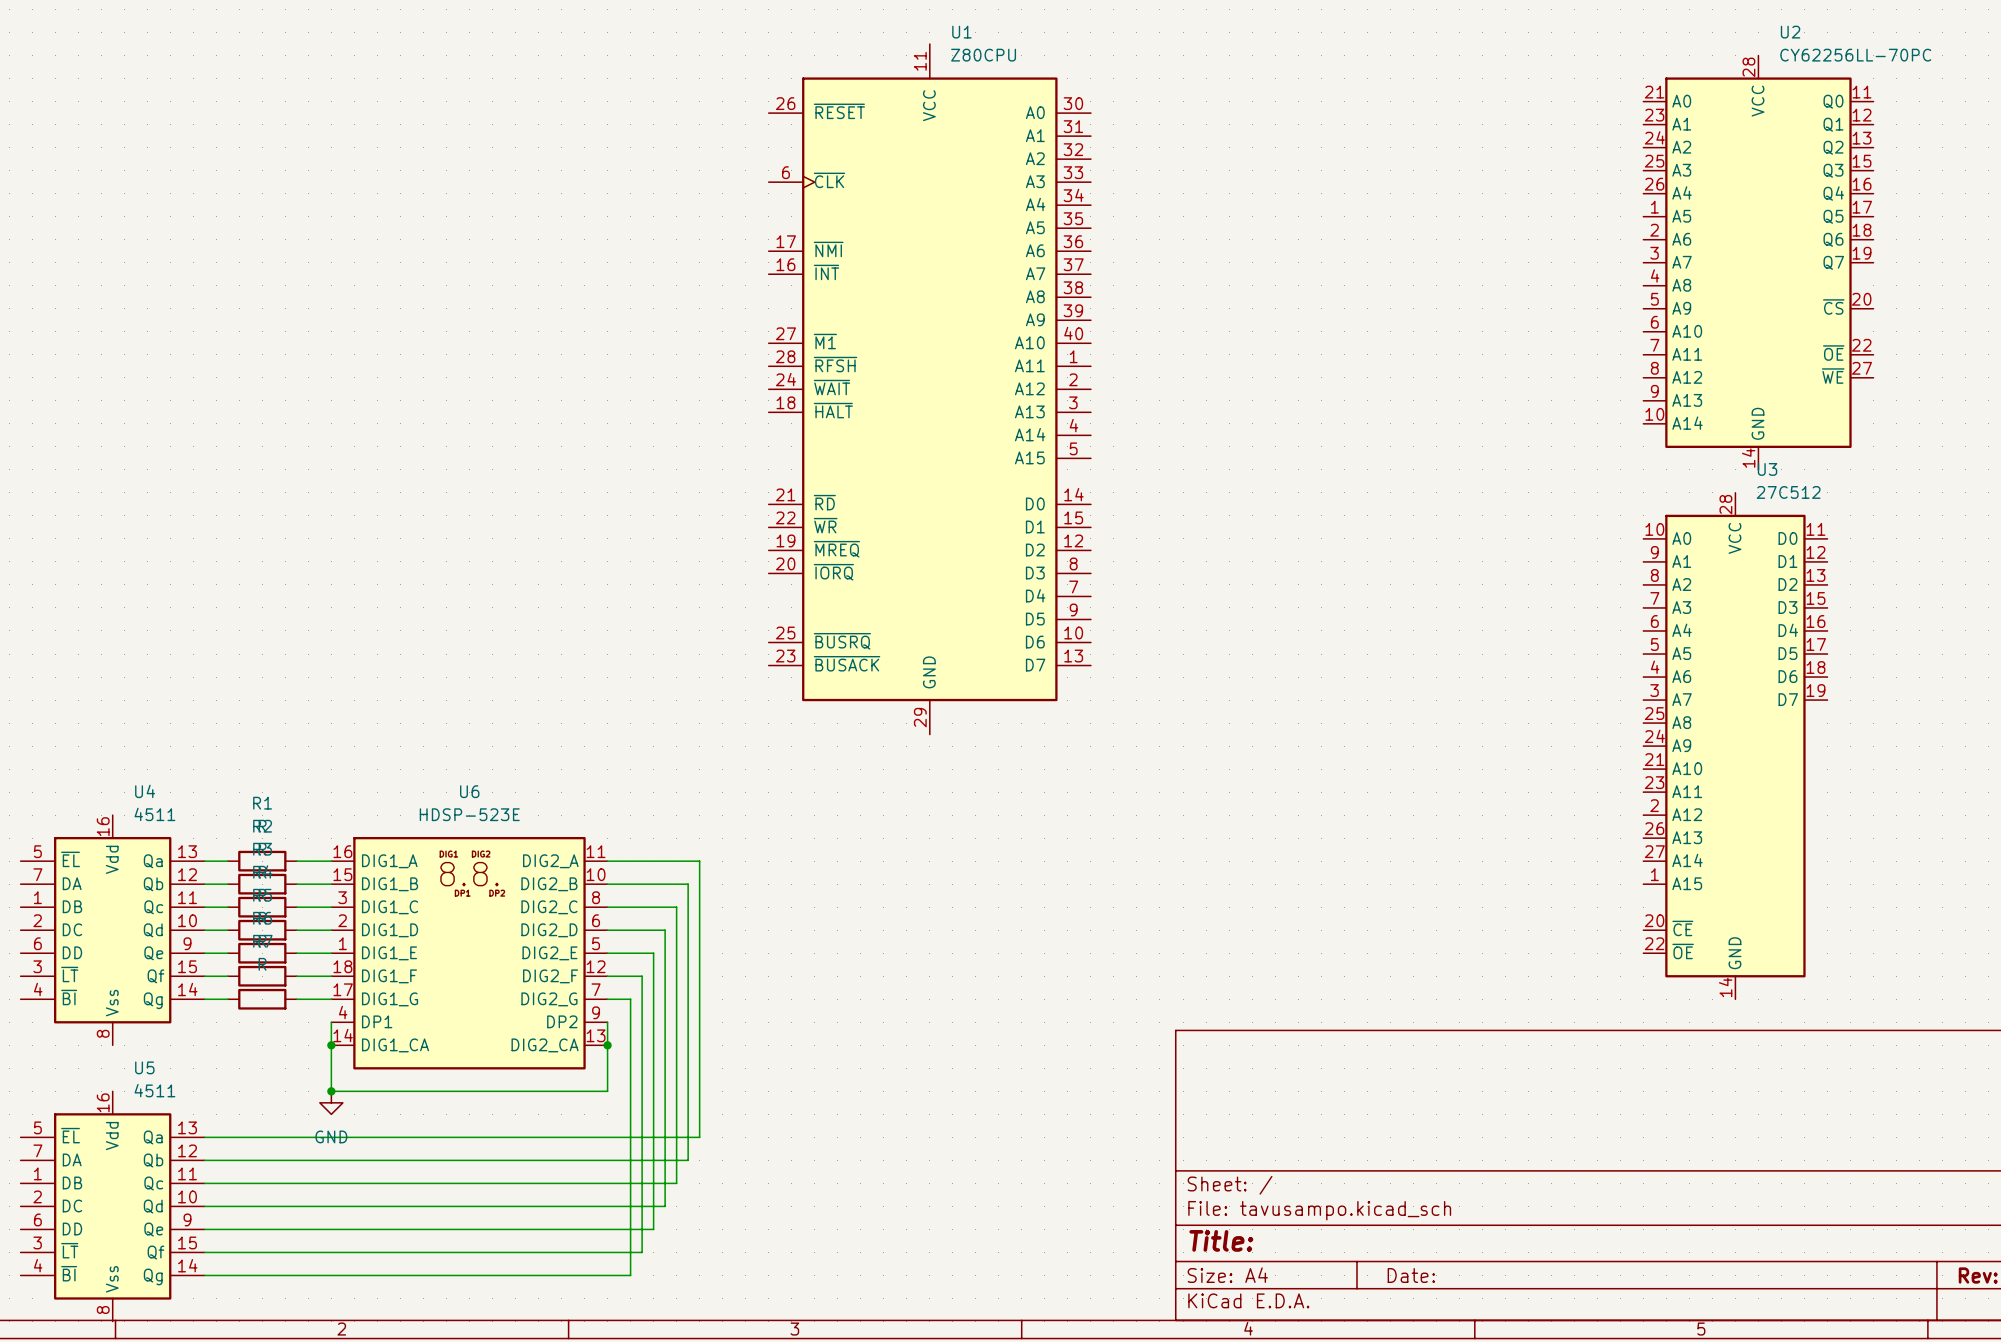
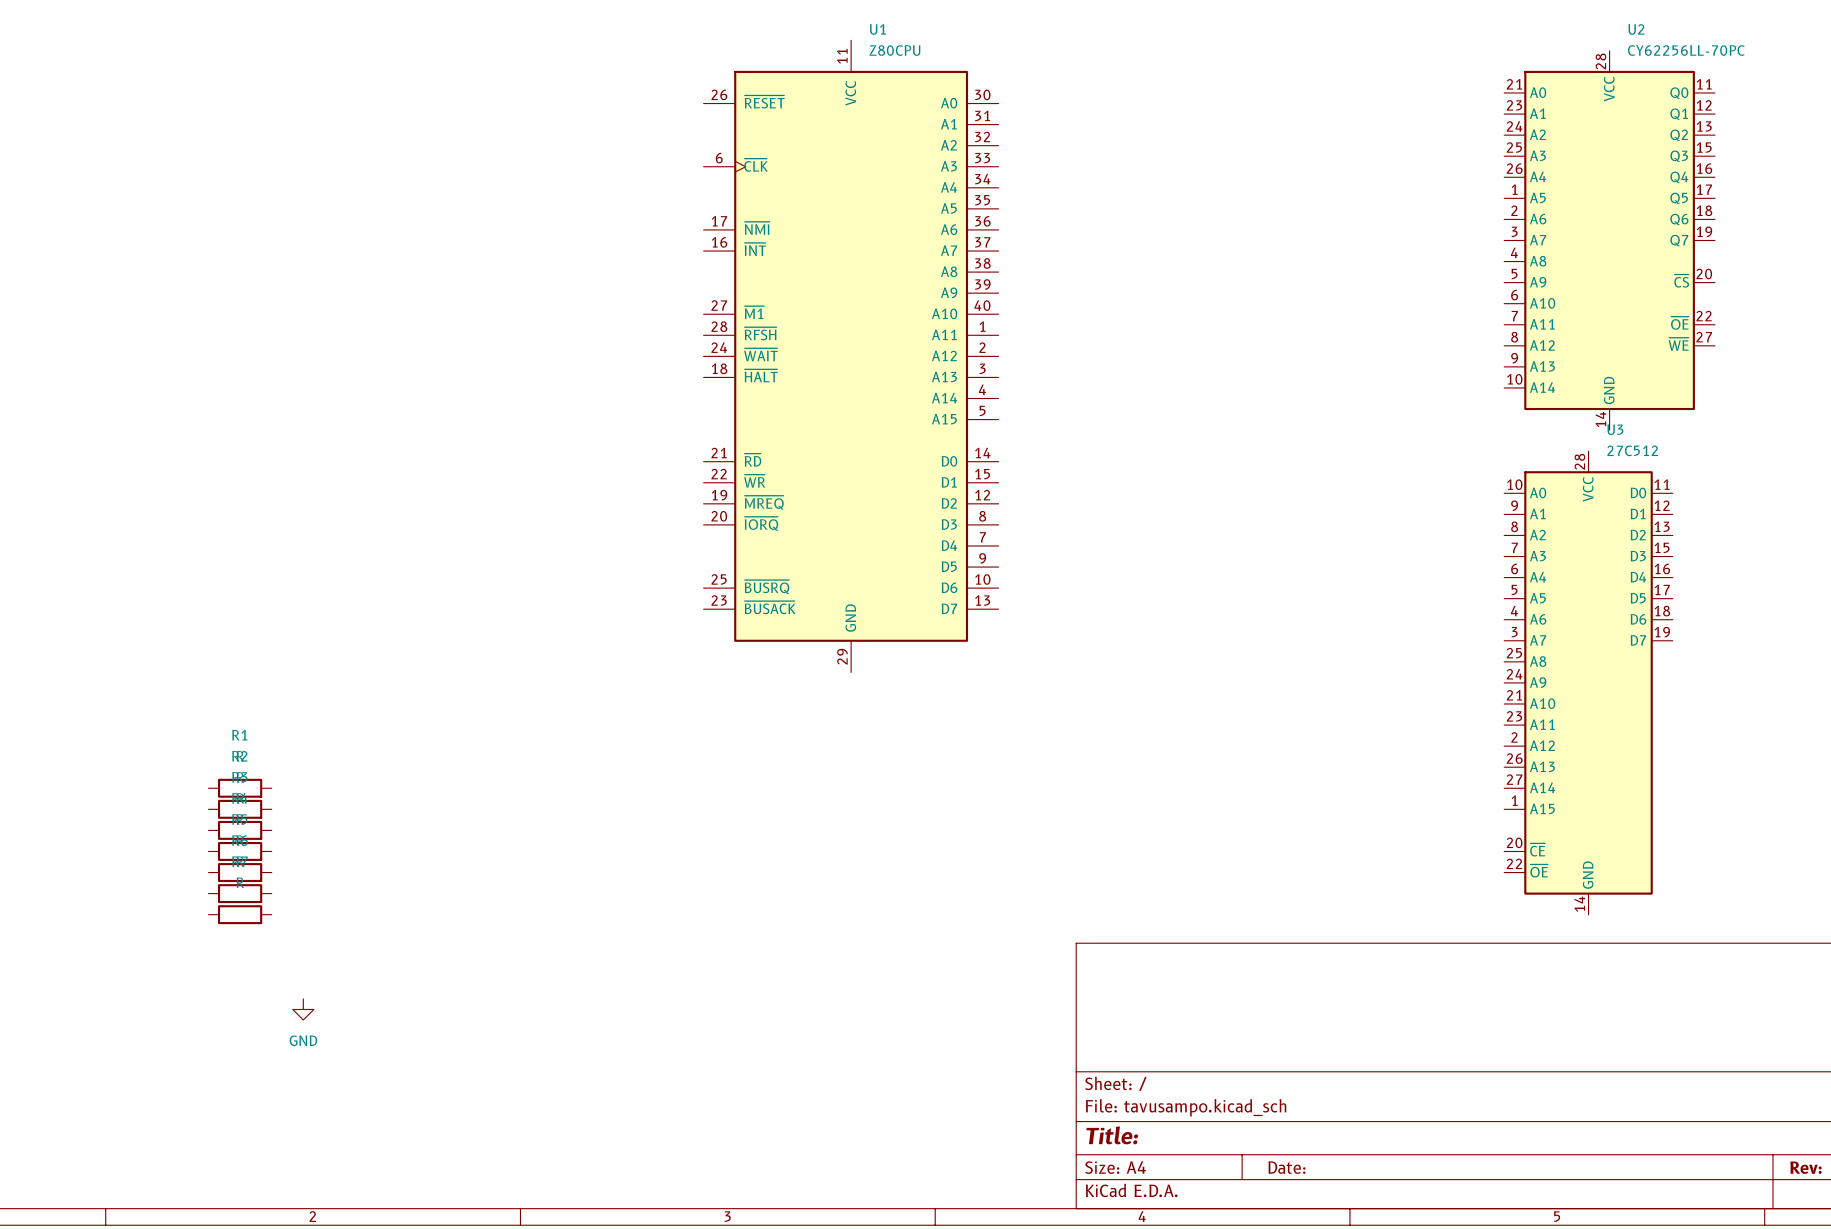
wire: (204, 861) (227, 861) -> none
wire: (296, 861) (331, 861) -> none
wire: (607, 861) (699, 861) (699, 1137) (204, 1137) -> none
wire: (204, 884) (227, 884) -> none
wire: (296, 884) (331, 884) -> none
wire: (607, 884) (688, 884) (688, 1160) (204, 1160) -> none
wire: (204, 907) (227, 907) -> none
wire: (296, 907) (331, 907) -> none
wire: (607, 907) (676, 907) (676, 1183) (204, 1183) -> none
U4: 4511 (112, 930) -> none
wire: (204, 930) (227, 930) -> none
wire: (296, 930) (331, 930) -> none
wire: (607, 930) (665, 930) (665, 1206) (204, 1206) -> none
wire: (204, 953) (227, 953) -> none
wire: (296, 953) (331, 953) -> none
U6: HDSP-523E (469, 953) -> none
wire: (607, 953) (653, 953) (653, 1229) (204, 1229) -> none
wire: (204, 976) (227, 976) -> none
wire: (296, 976) (331, 976) -> none
wire: (607, 976) (642, 976) (642, 1252) (204, 1252) -> none
wire: (204, 999) (227, 999) -> none
wire: (296, 999) (331, 999) -> none
wire: (607, 999) (630, 999) (630, 1275) (204, 1275) -> none
wire: (331, 1022) (331, 1091) (607, 1091) (607, 1022) -> none
junction: (331, 1045) -> none
junction: (607, 1045) -> none
junction: (331, 1091) -> none
U5: 4511 (112, 1206) -> none

